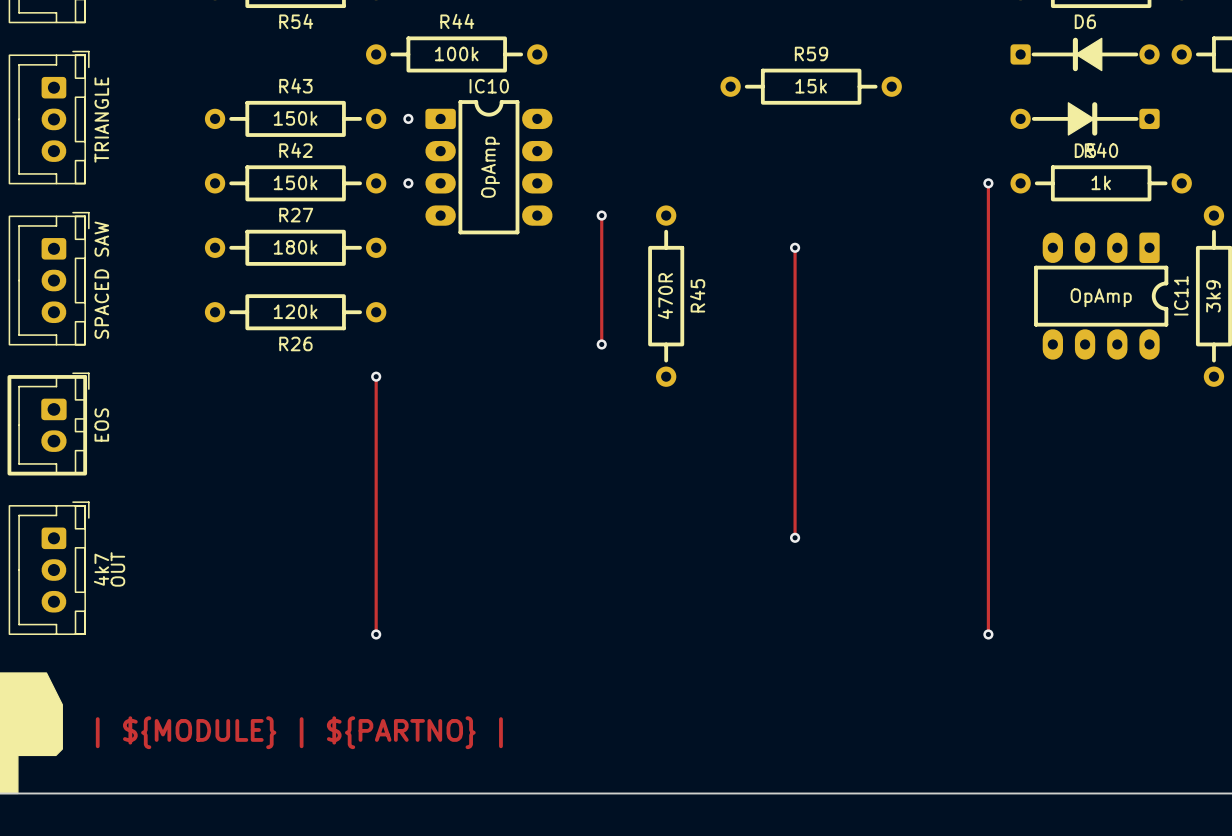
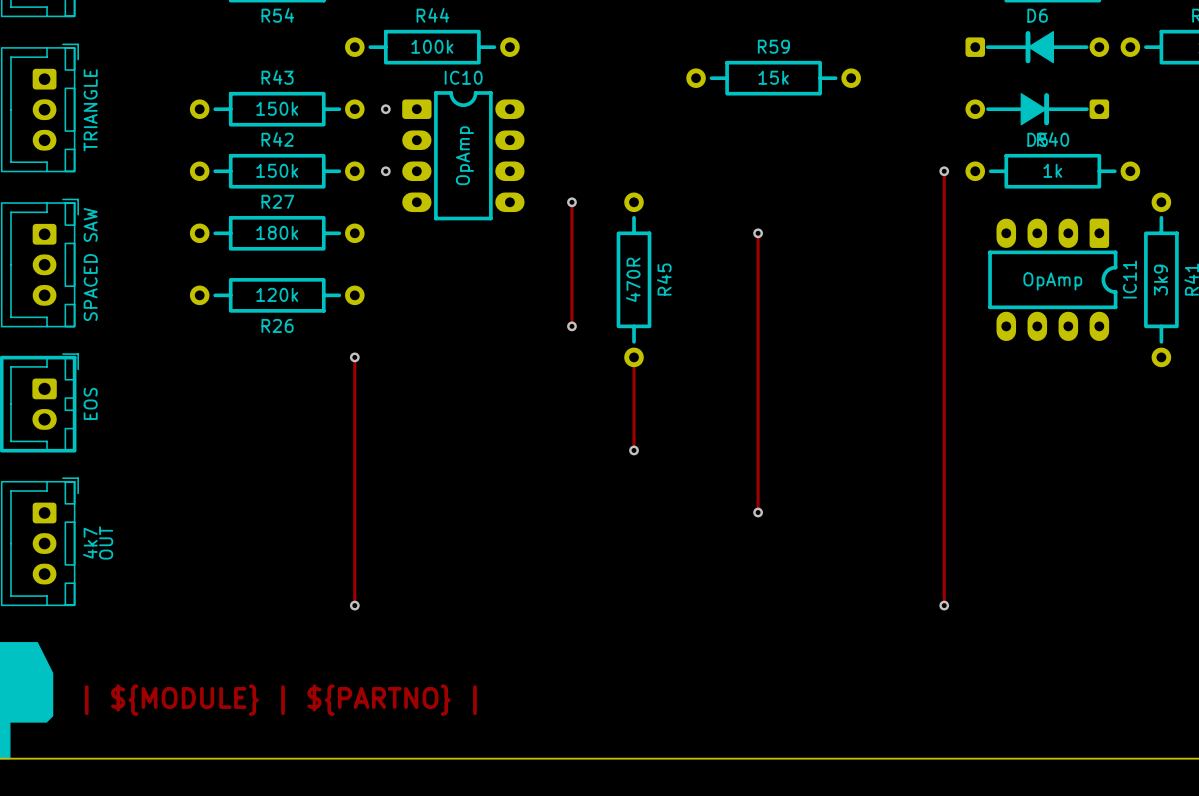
track: none -> (634, 357) (634, 450)
via: none -> (634, 450)

